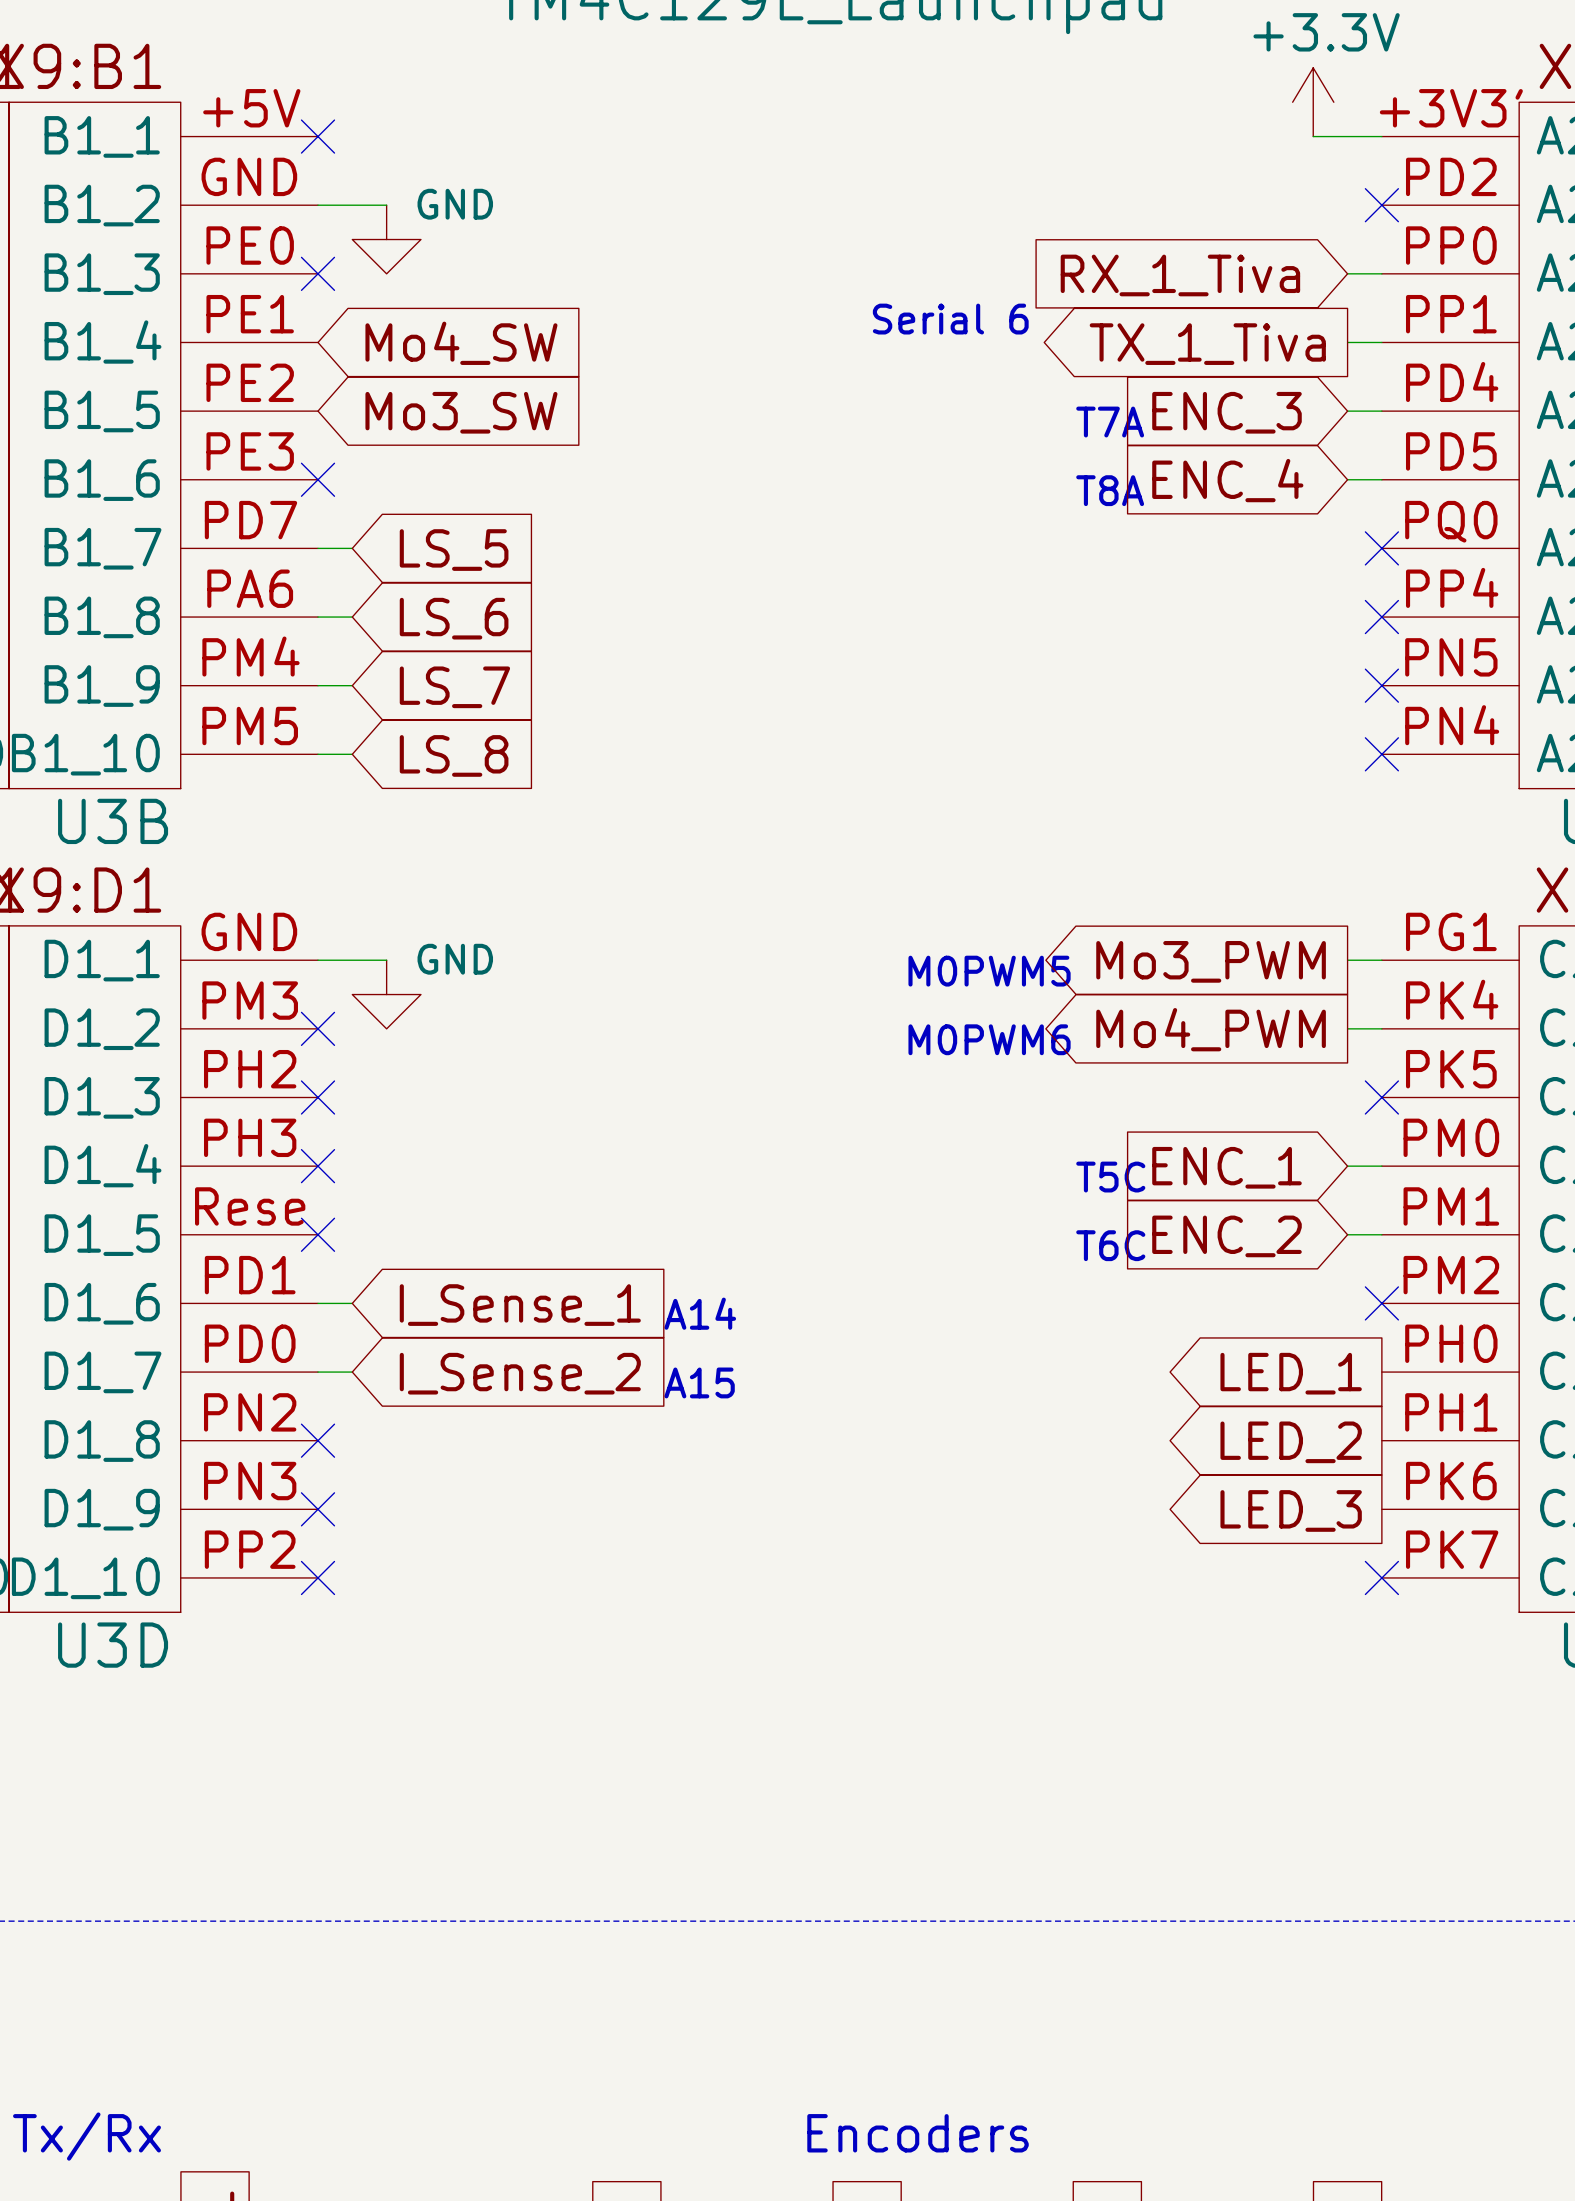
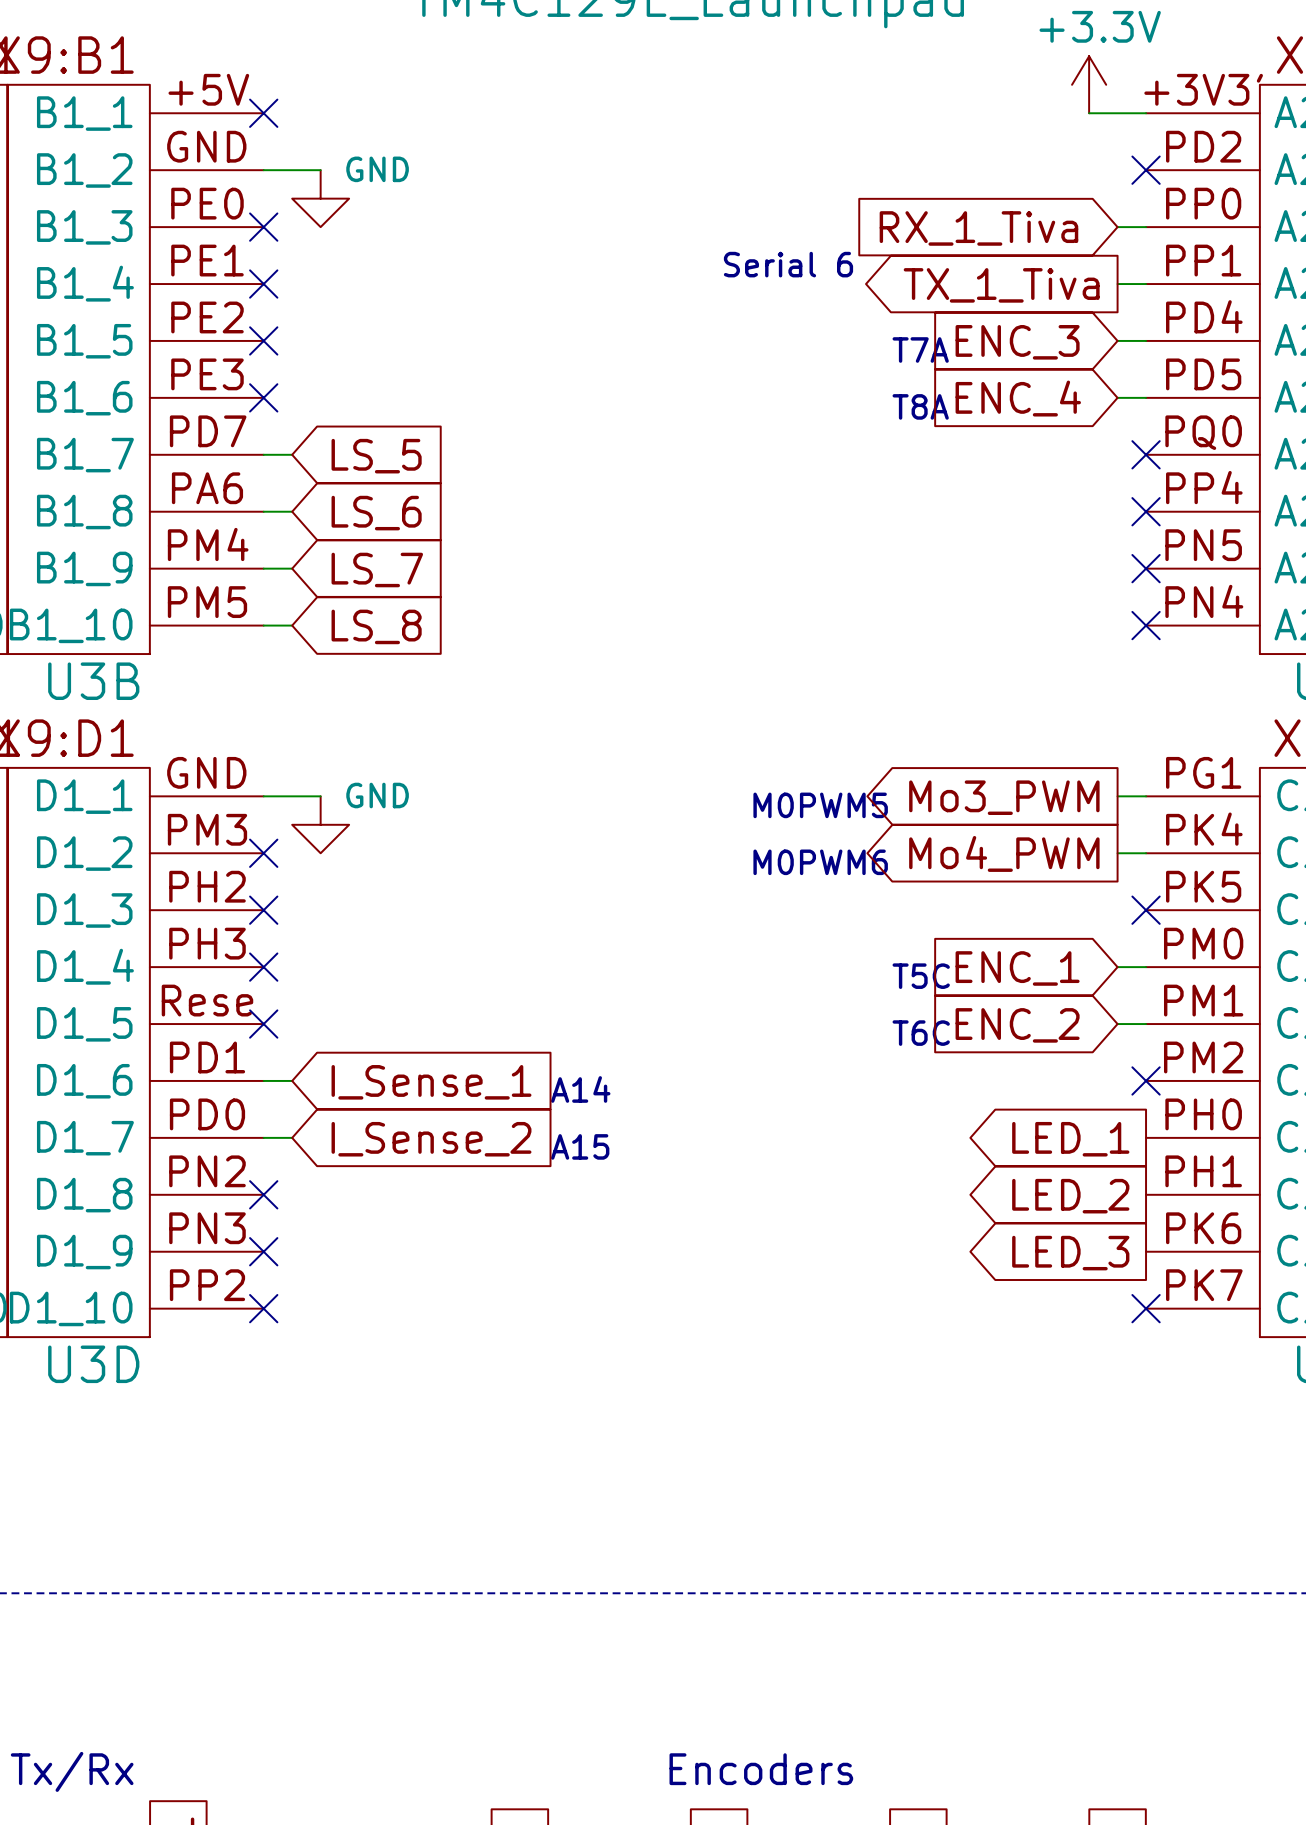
no-connect mark: none -> (263, 284)
global label: Mo4_SW (461, 343) -> none
no-connect mark: none -> (263, 340)
global label: Mo3_SW (461, 412) -> none

